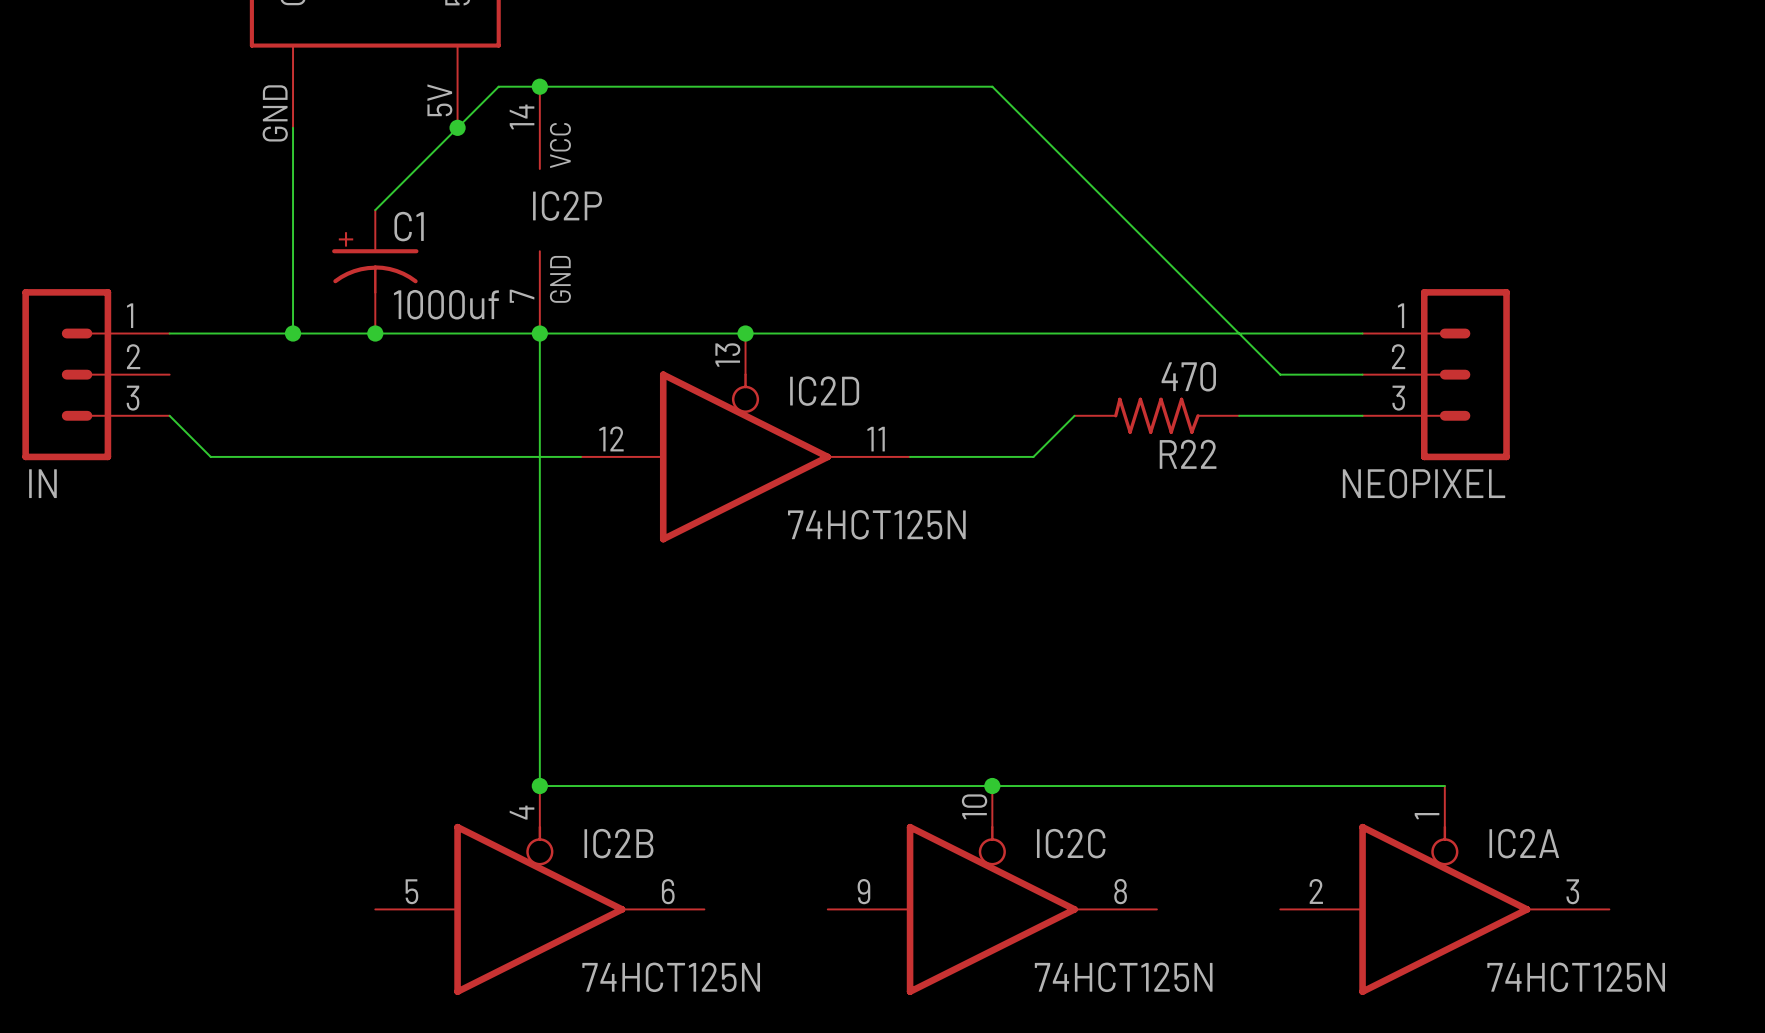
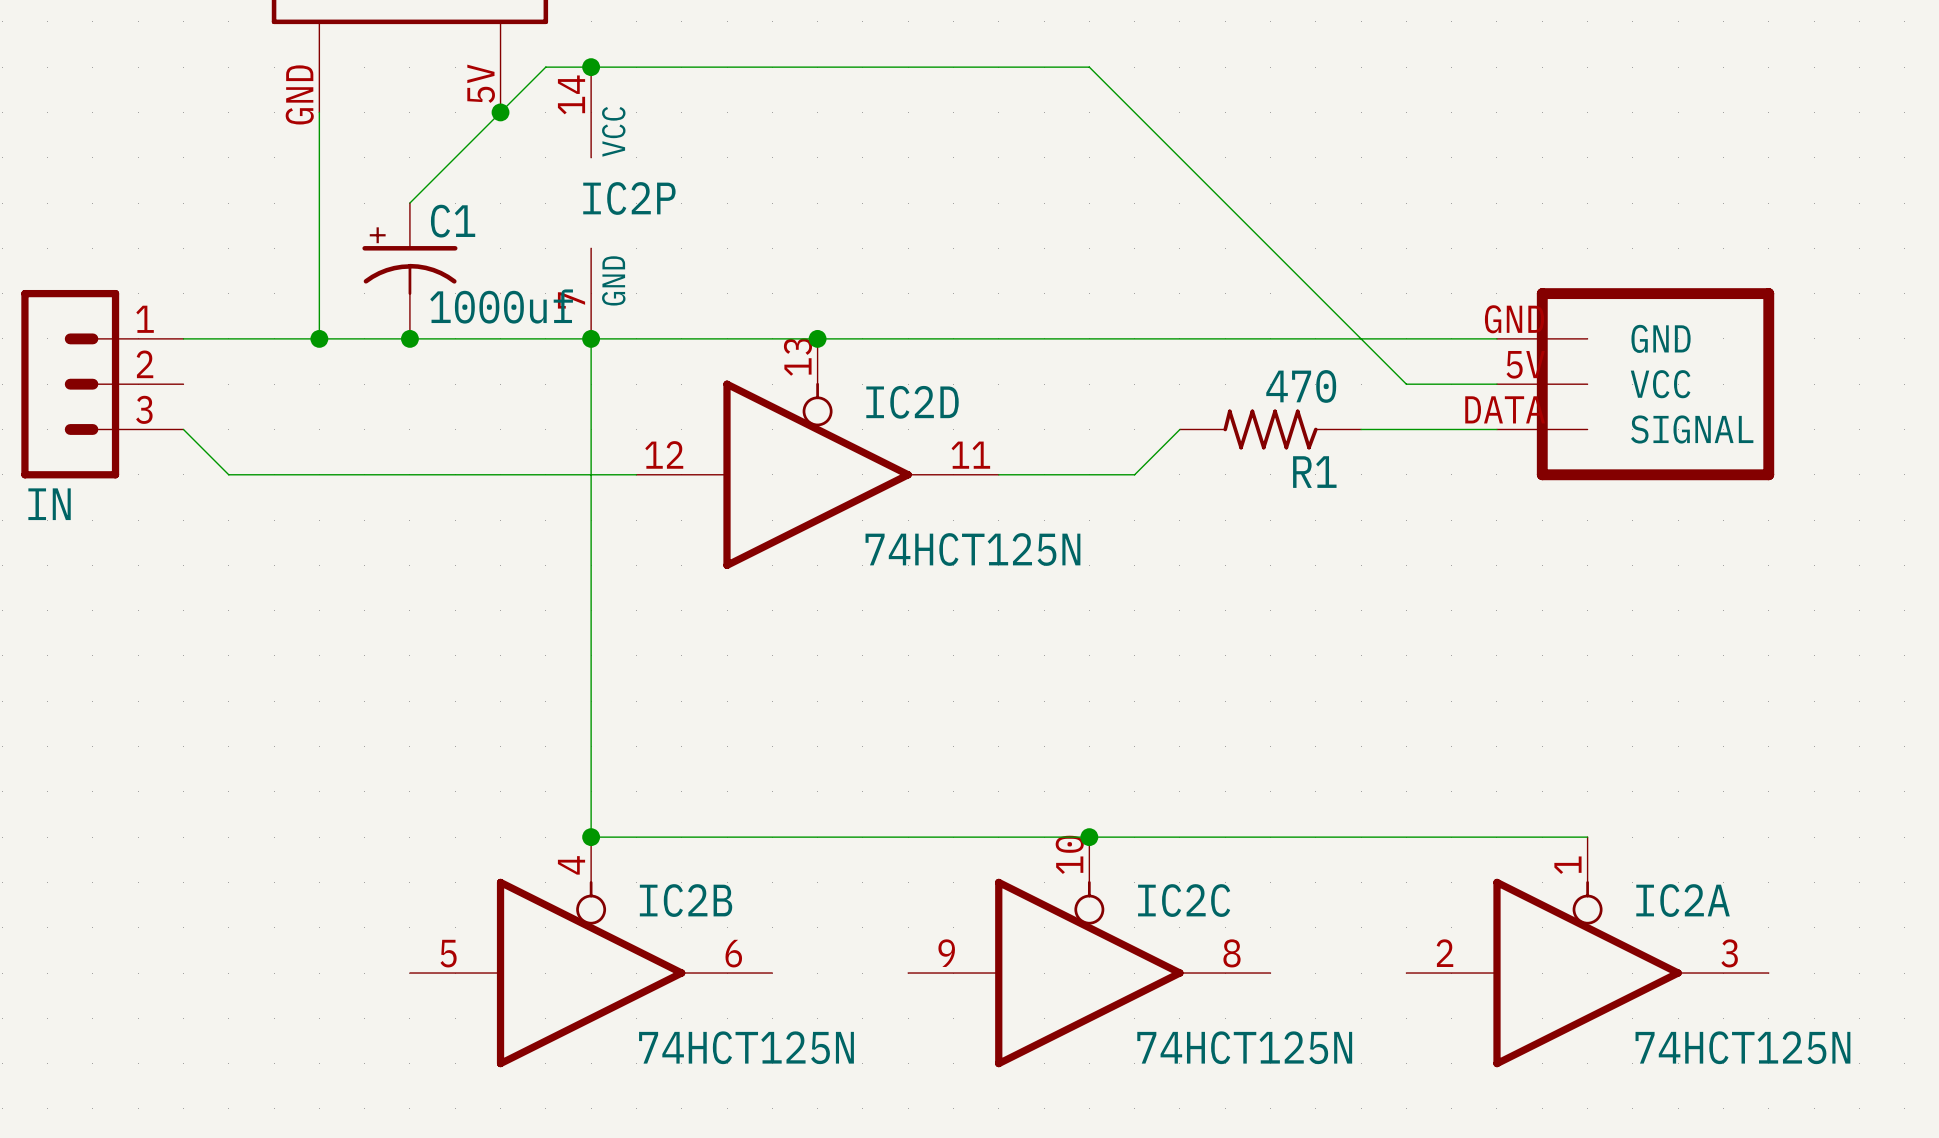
NEOPIXEL: (1436, 374) -> none
part: none -> (1635, 384)
R22 name: R22 (1188, 454) -> R1 (1314, 472)

